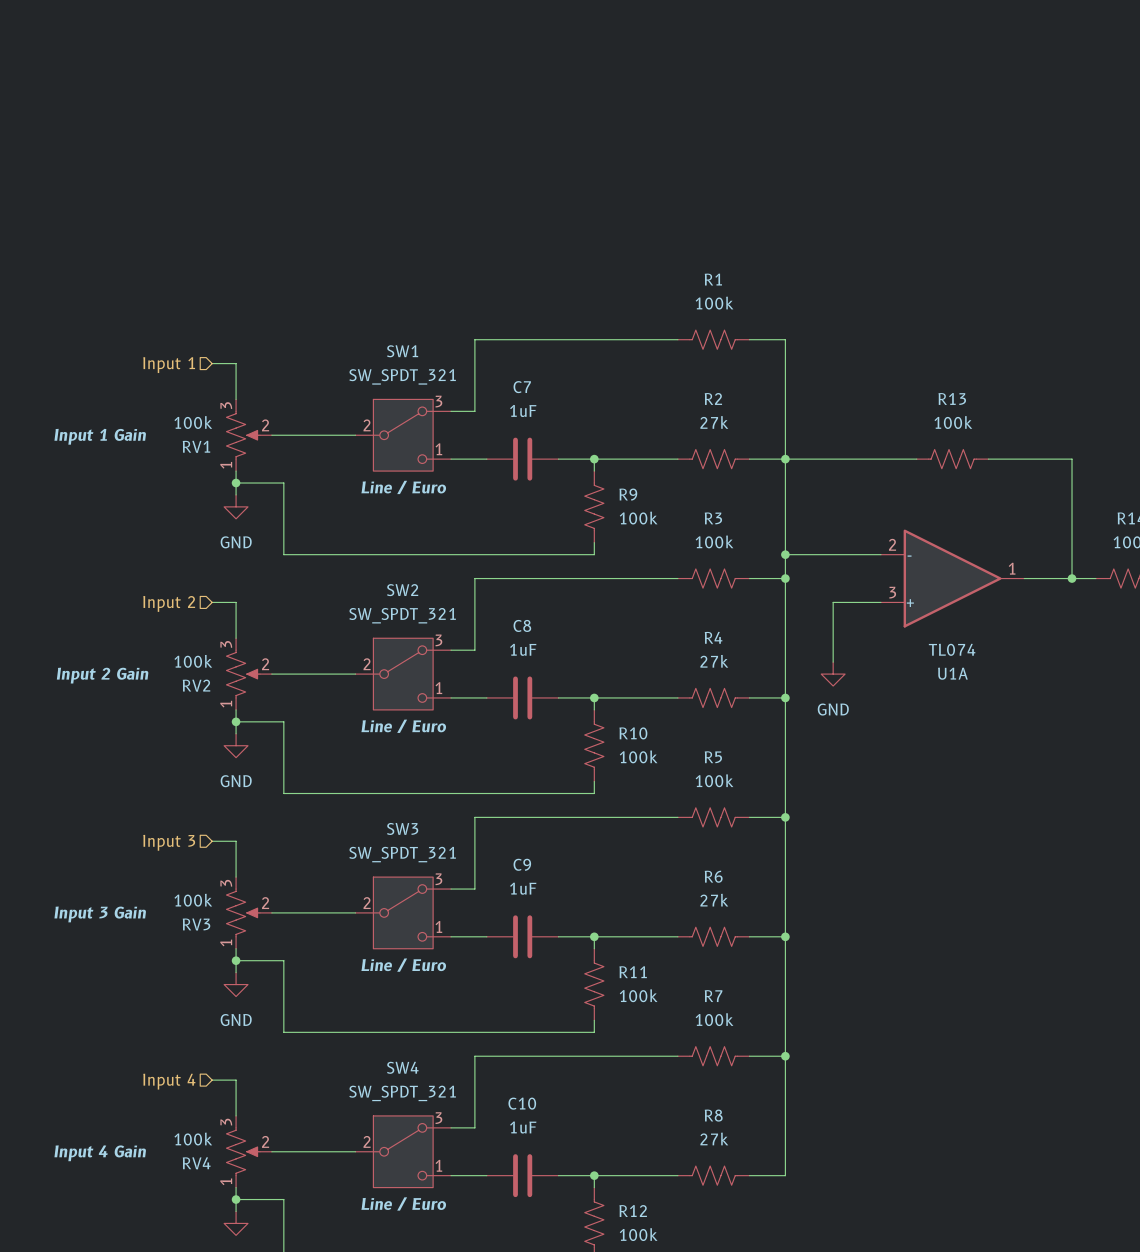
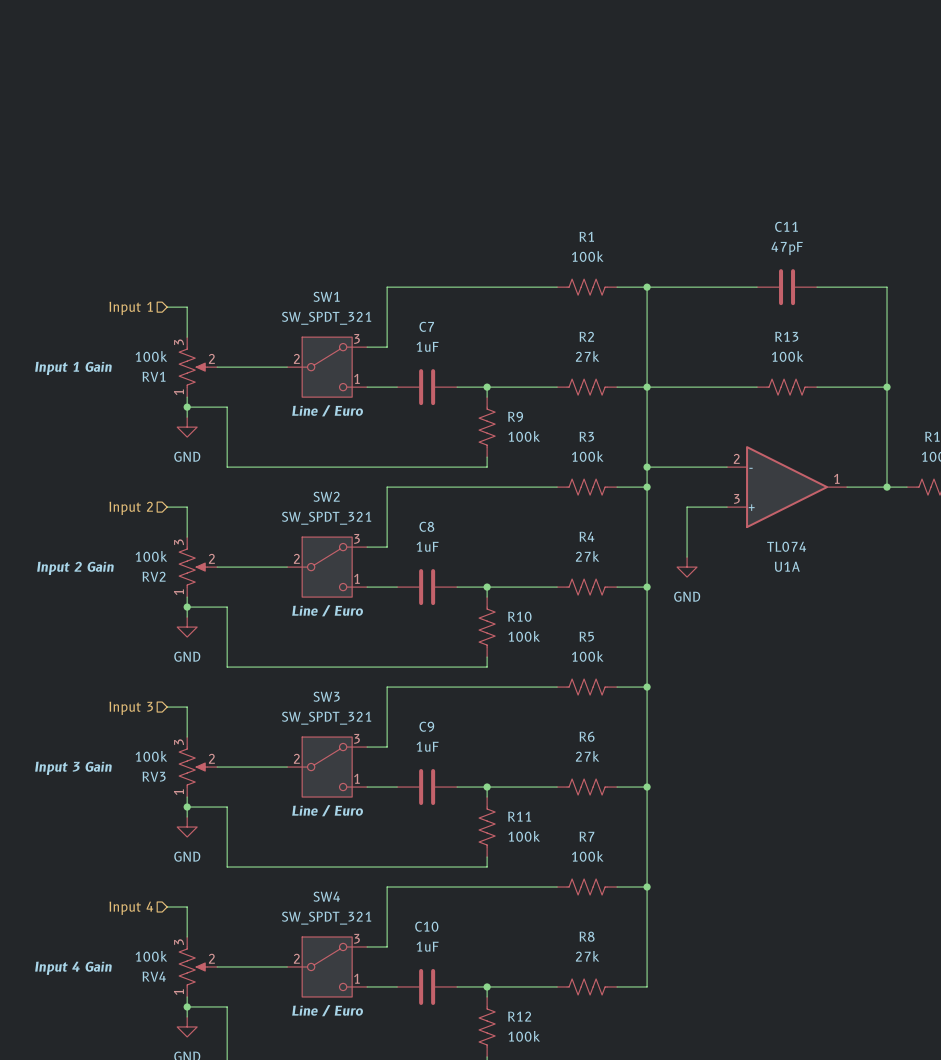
wire: none -> (647, 287) (757, 287)
junction: none -> (647, 287)
C11: none -> 47pF (787, 287)
wire: none -> (817, 287) (887, 287) (887, 387)
junction: none -> (887, 387)

